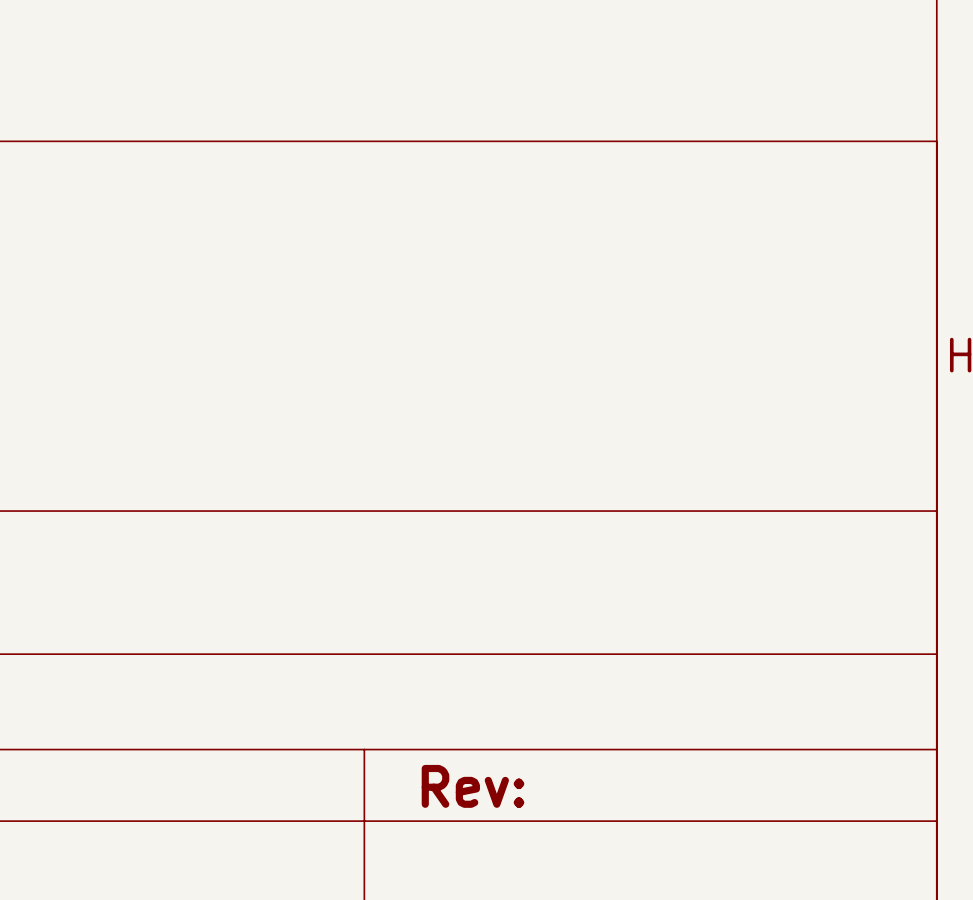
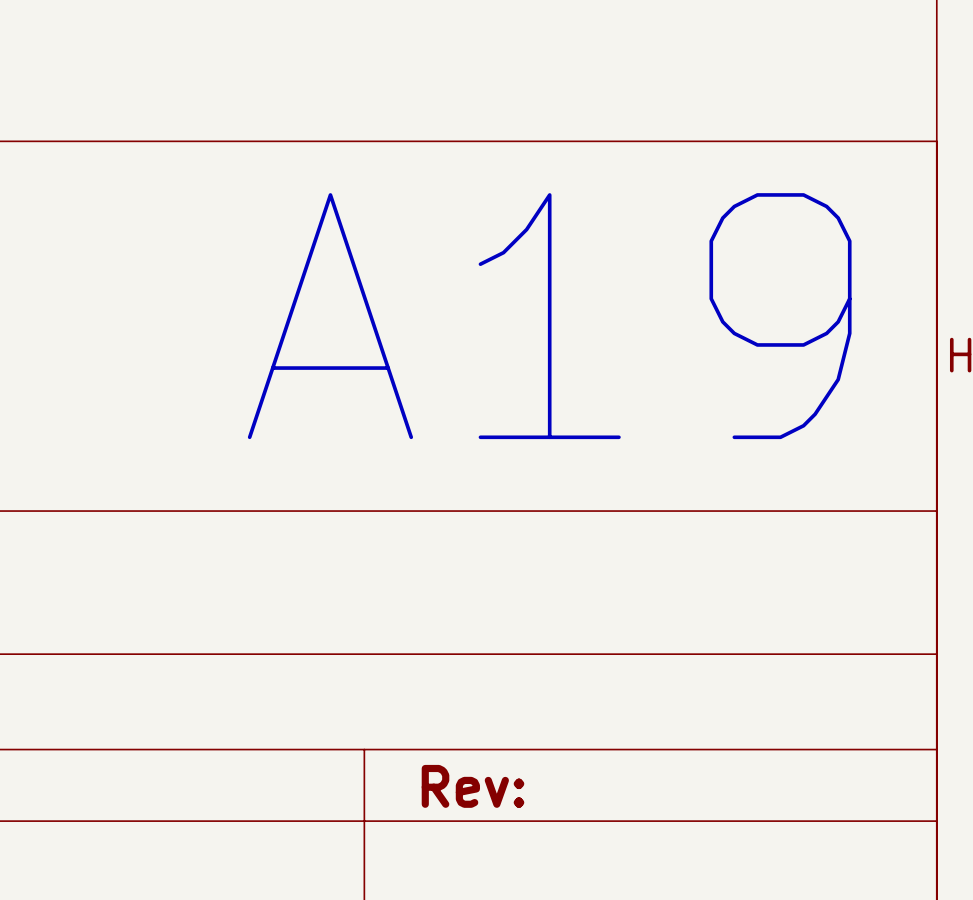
text: none -> A19 (549, 316)

